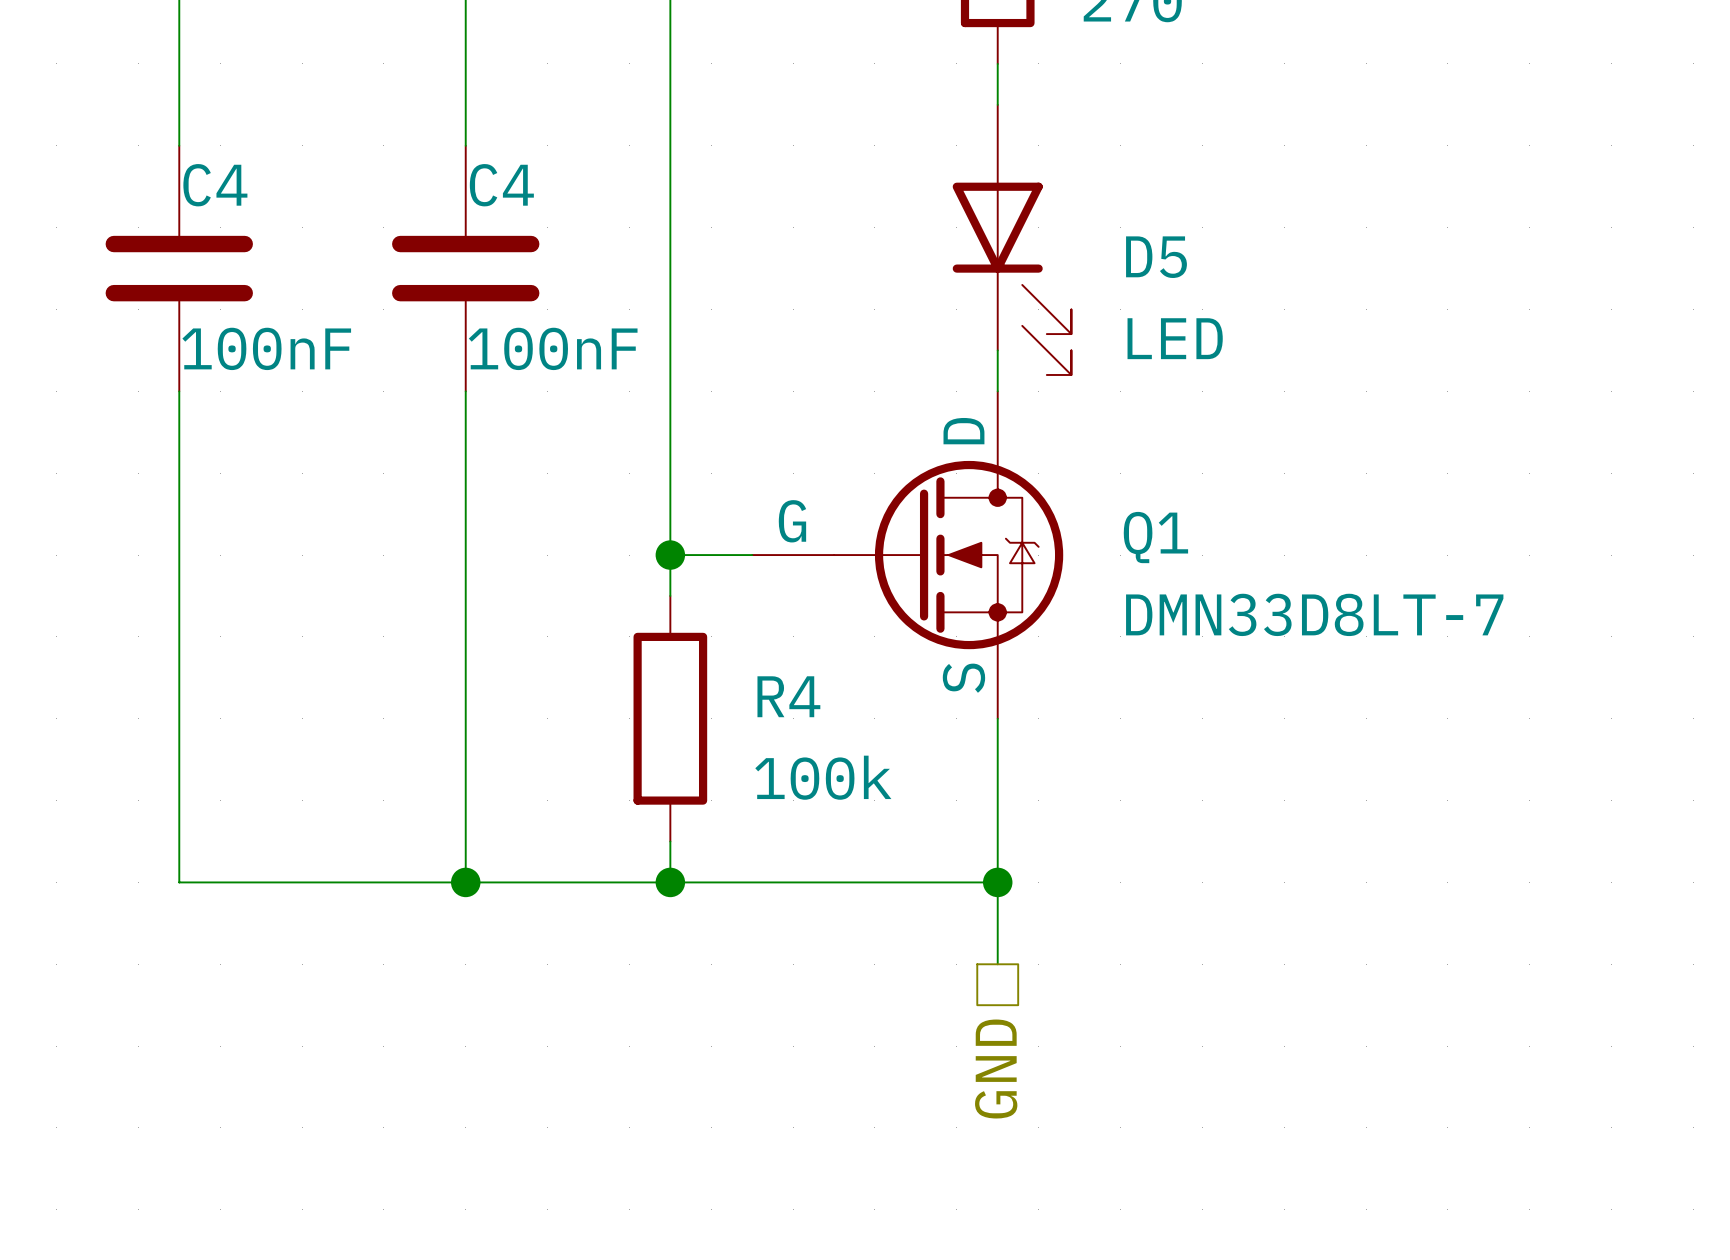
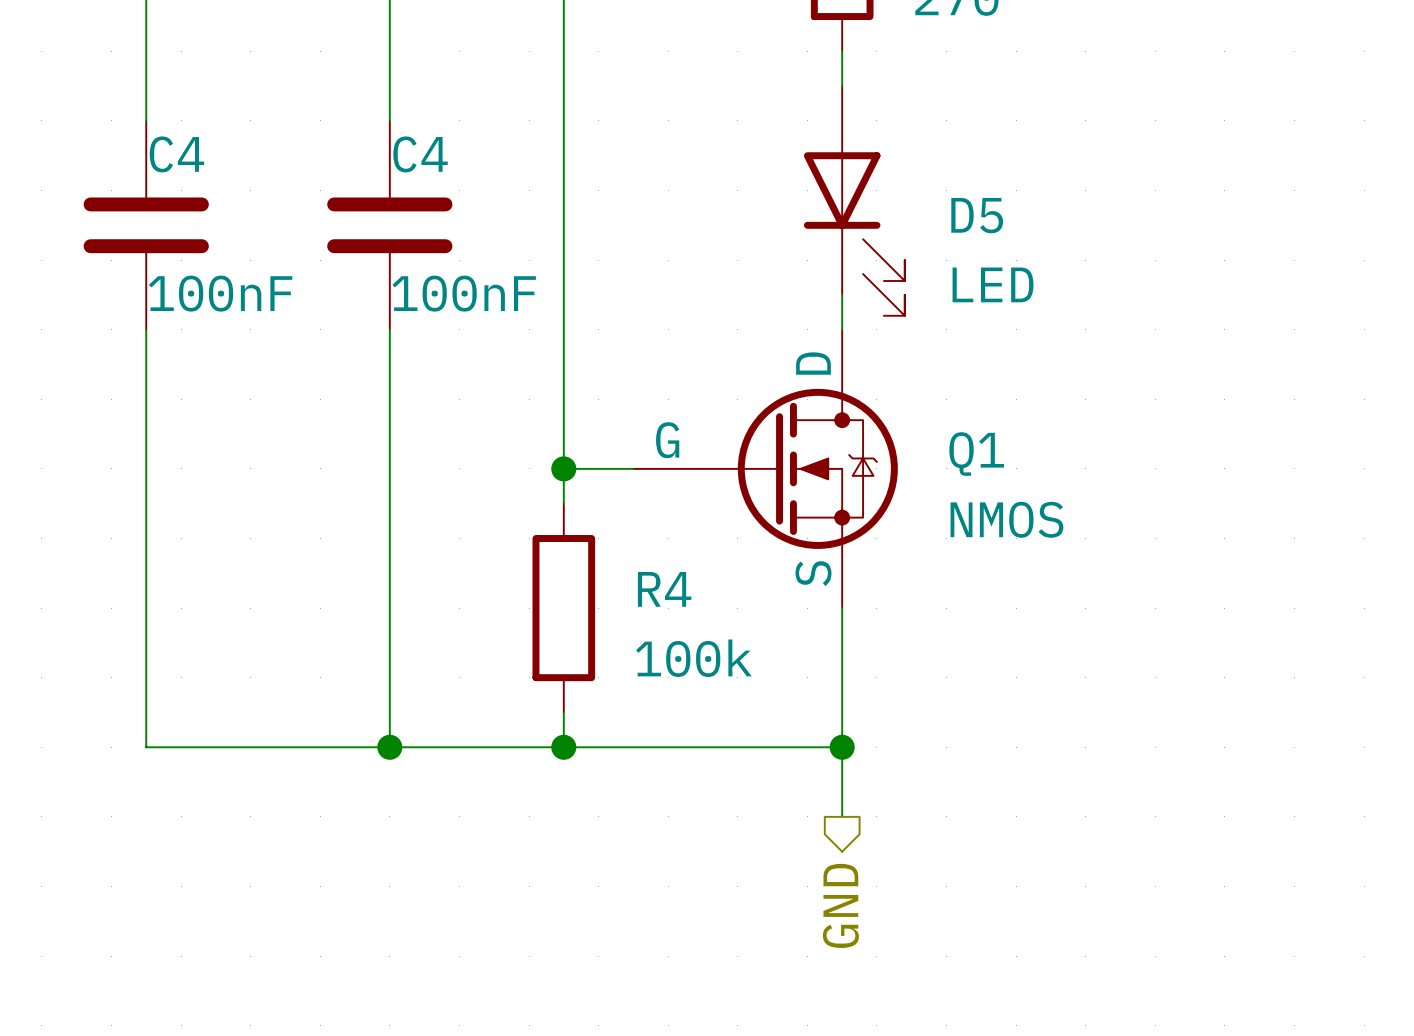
Q1 value: DMN33D8LT-7 (1314, 614) -> NMOS (1006, 519)
hierarchical label shape: passive (996, 1069) -> output (840, 905)

